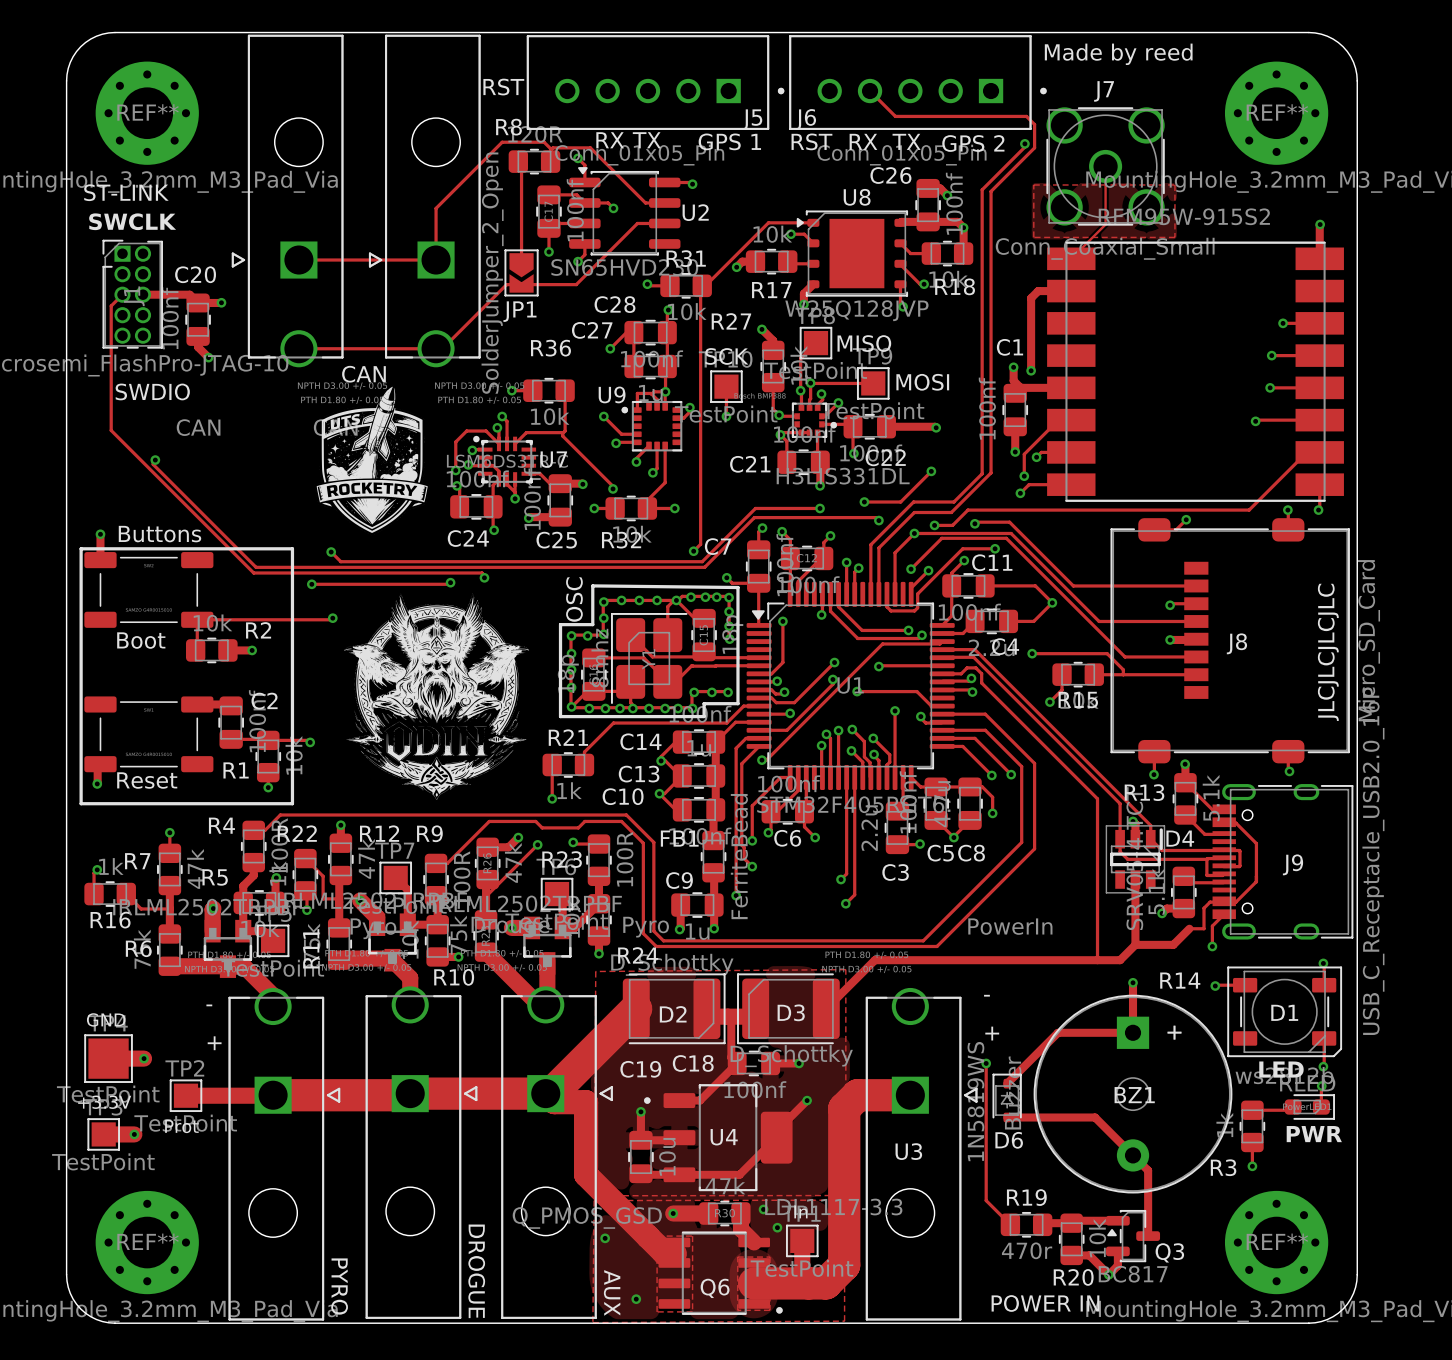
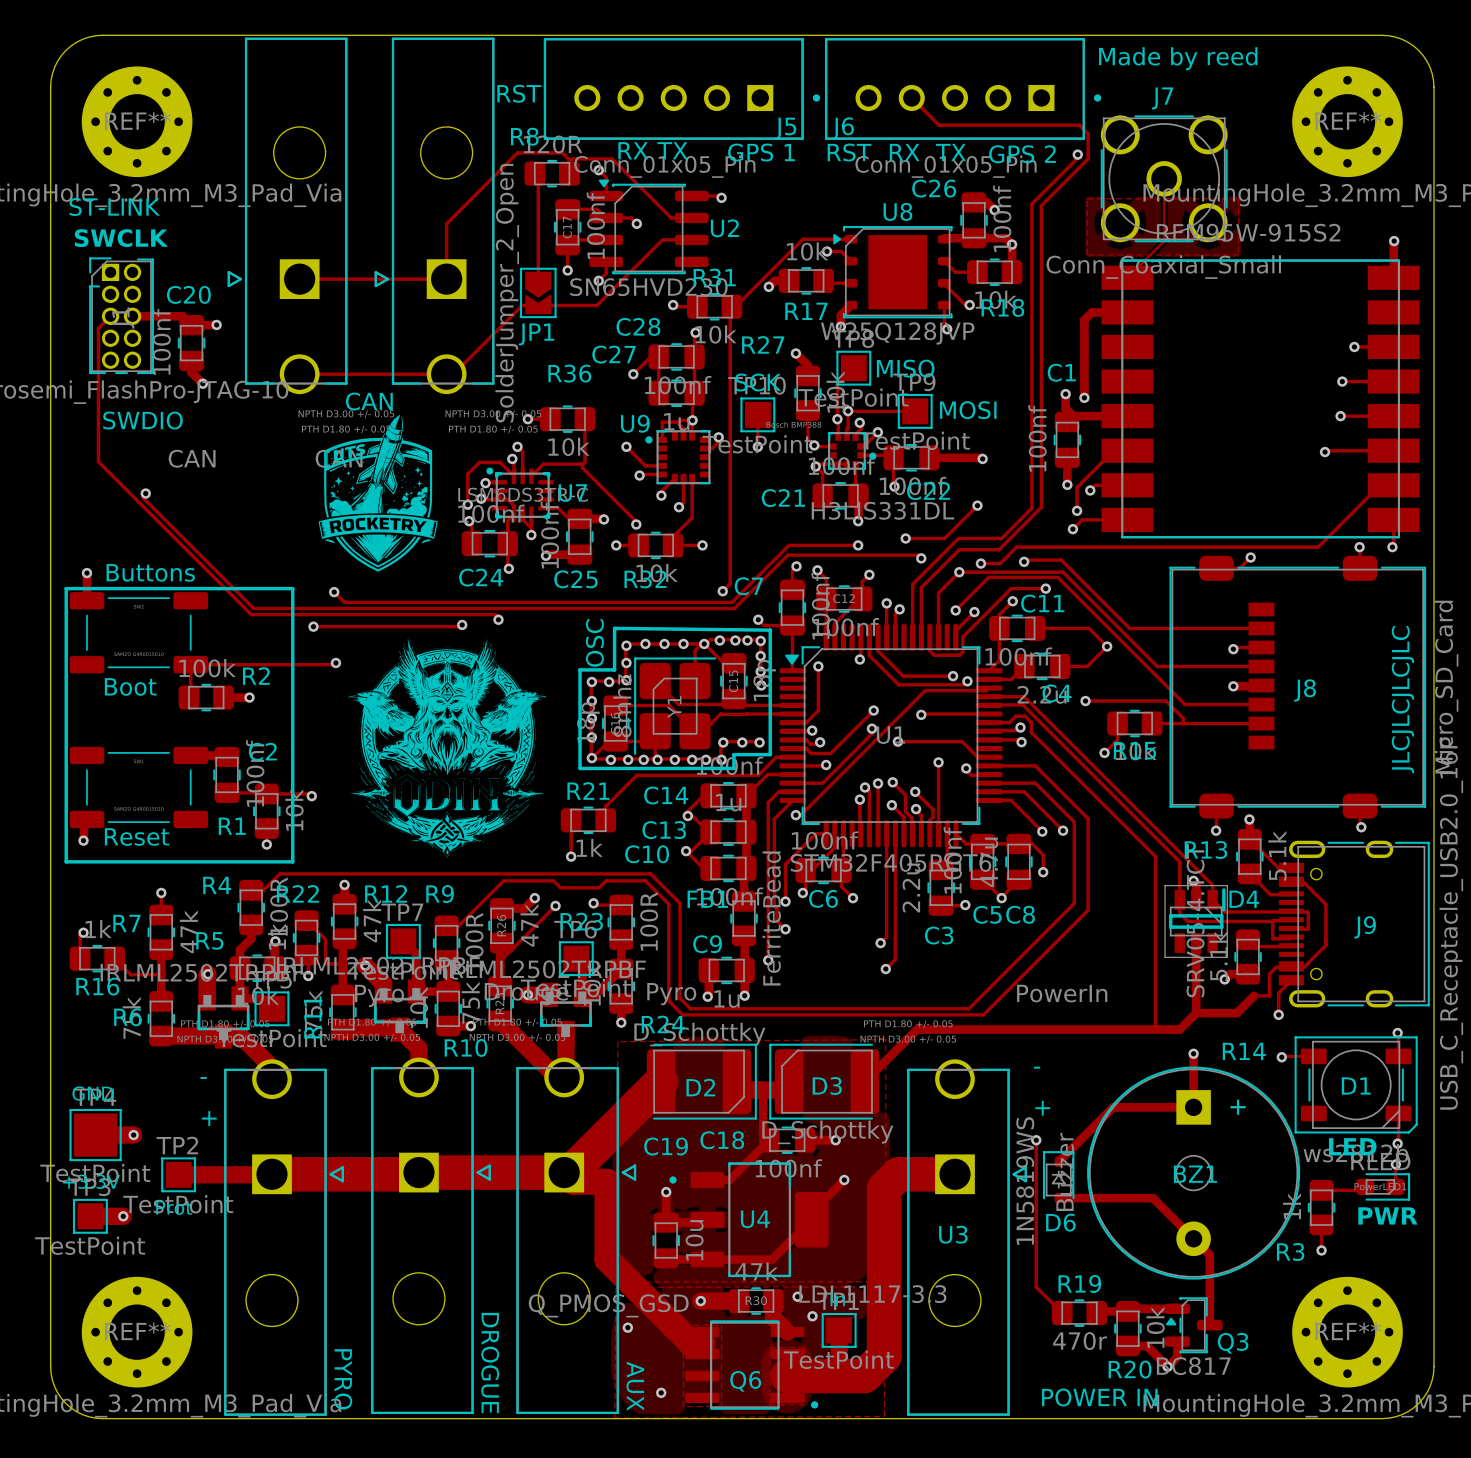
R2 value: 10k (212, 623) -> 100k (207, 668)

